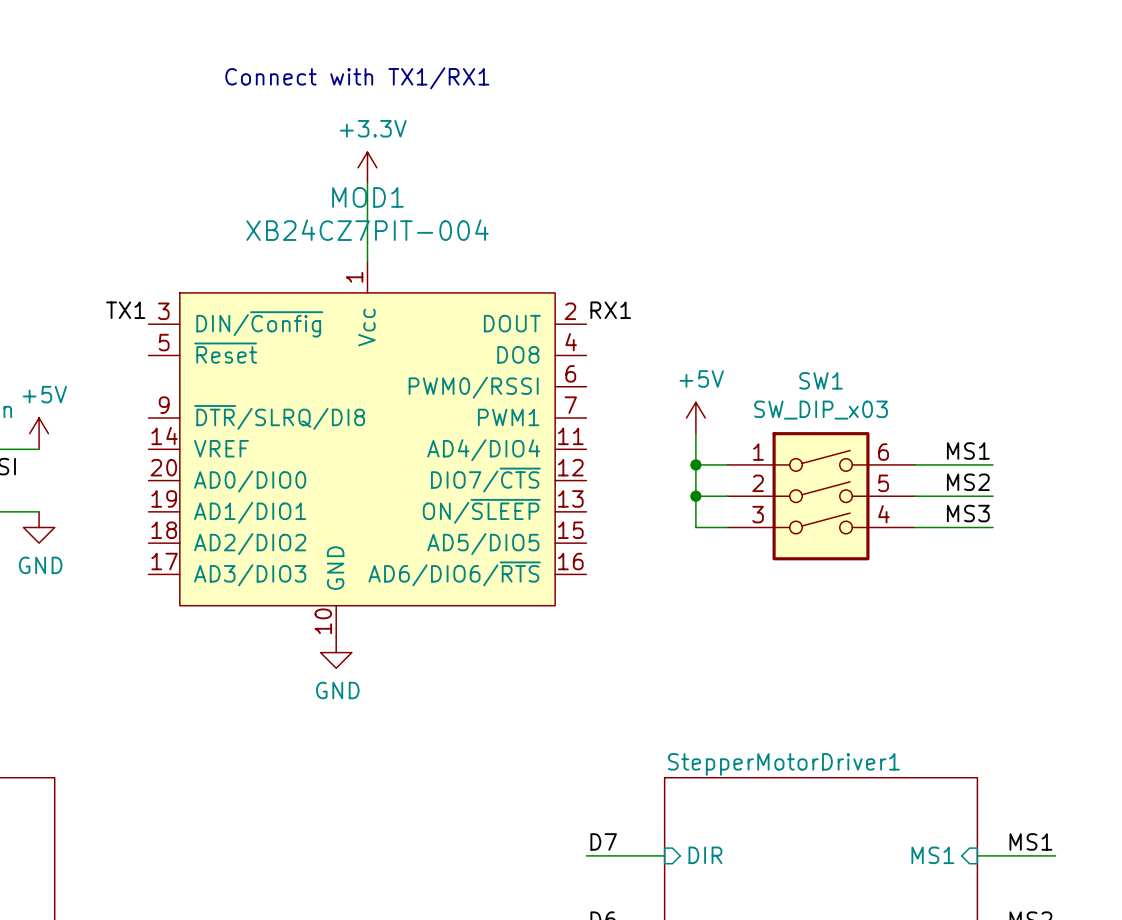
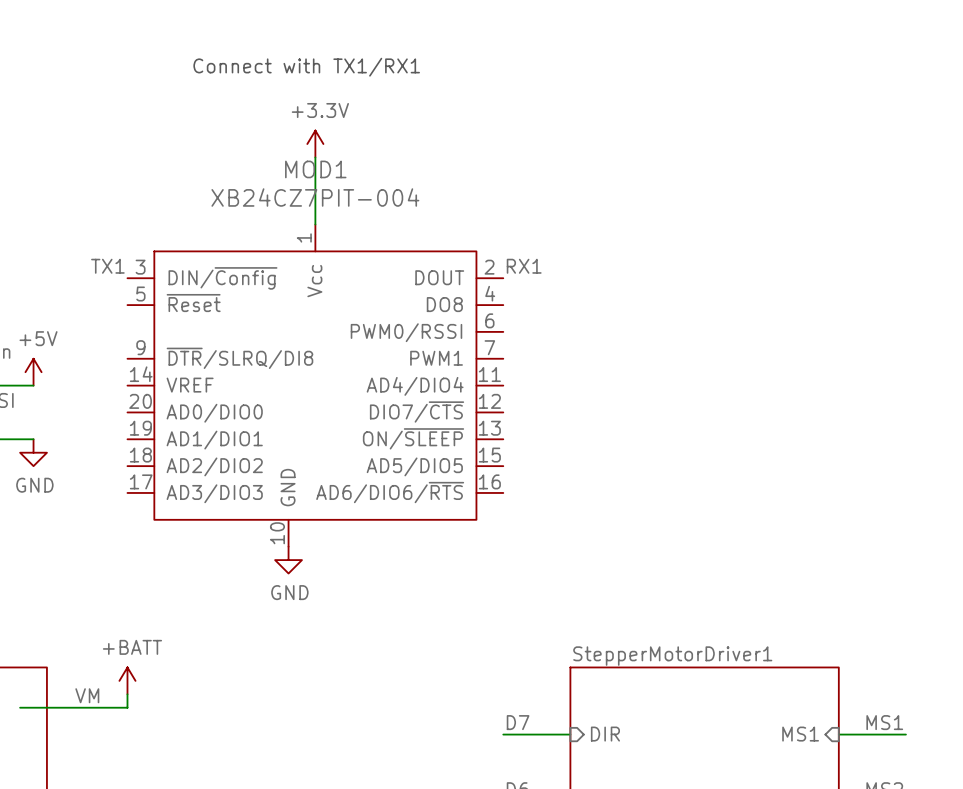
power symbol: +5V (695, 418) -> none
wire: (695, 433) (695, 527) (727, 527) -> none
label: MS1 (968, 450) -> none
wire: (695, 464) (727, 464) -> none
junction: (695, 464) -> none
wire: (914, 464) (993, 464) -> none
label: MS2 (968, 482) -> none
wire: (695, 496) (727, 496) -> none
junction: (695, 496) -> none
SW1: SW_DIP_x03 (821, 496) -> none
wire: (914, 496) (993, 496) -> none
label: MS3 (968, 513) -> none
wire: (914, 527) (993, 527) -> none
power symbol: none -> +BATT (127, 680)
wire: none -> (127, 694) (127, 707) (20, 707)
label: none -> VM (87, 695)

